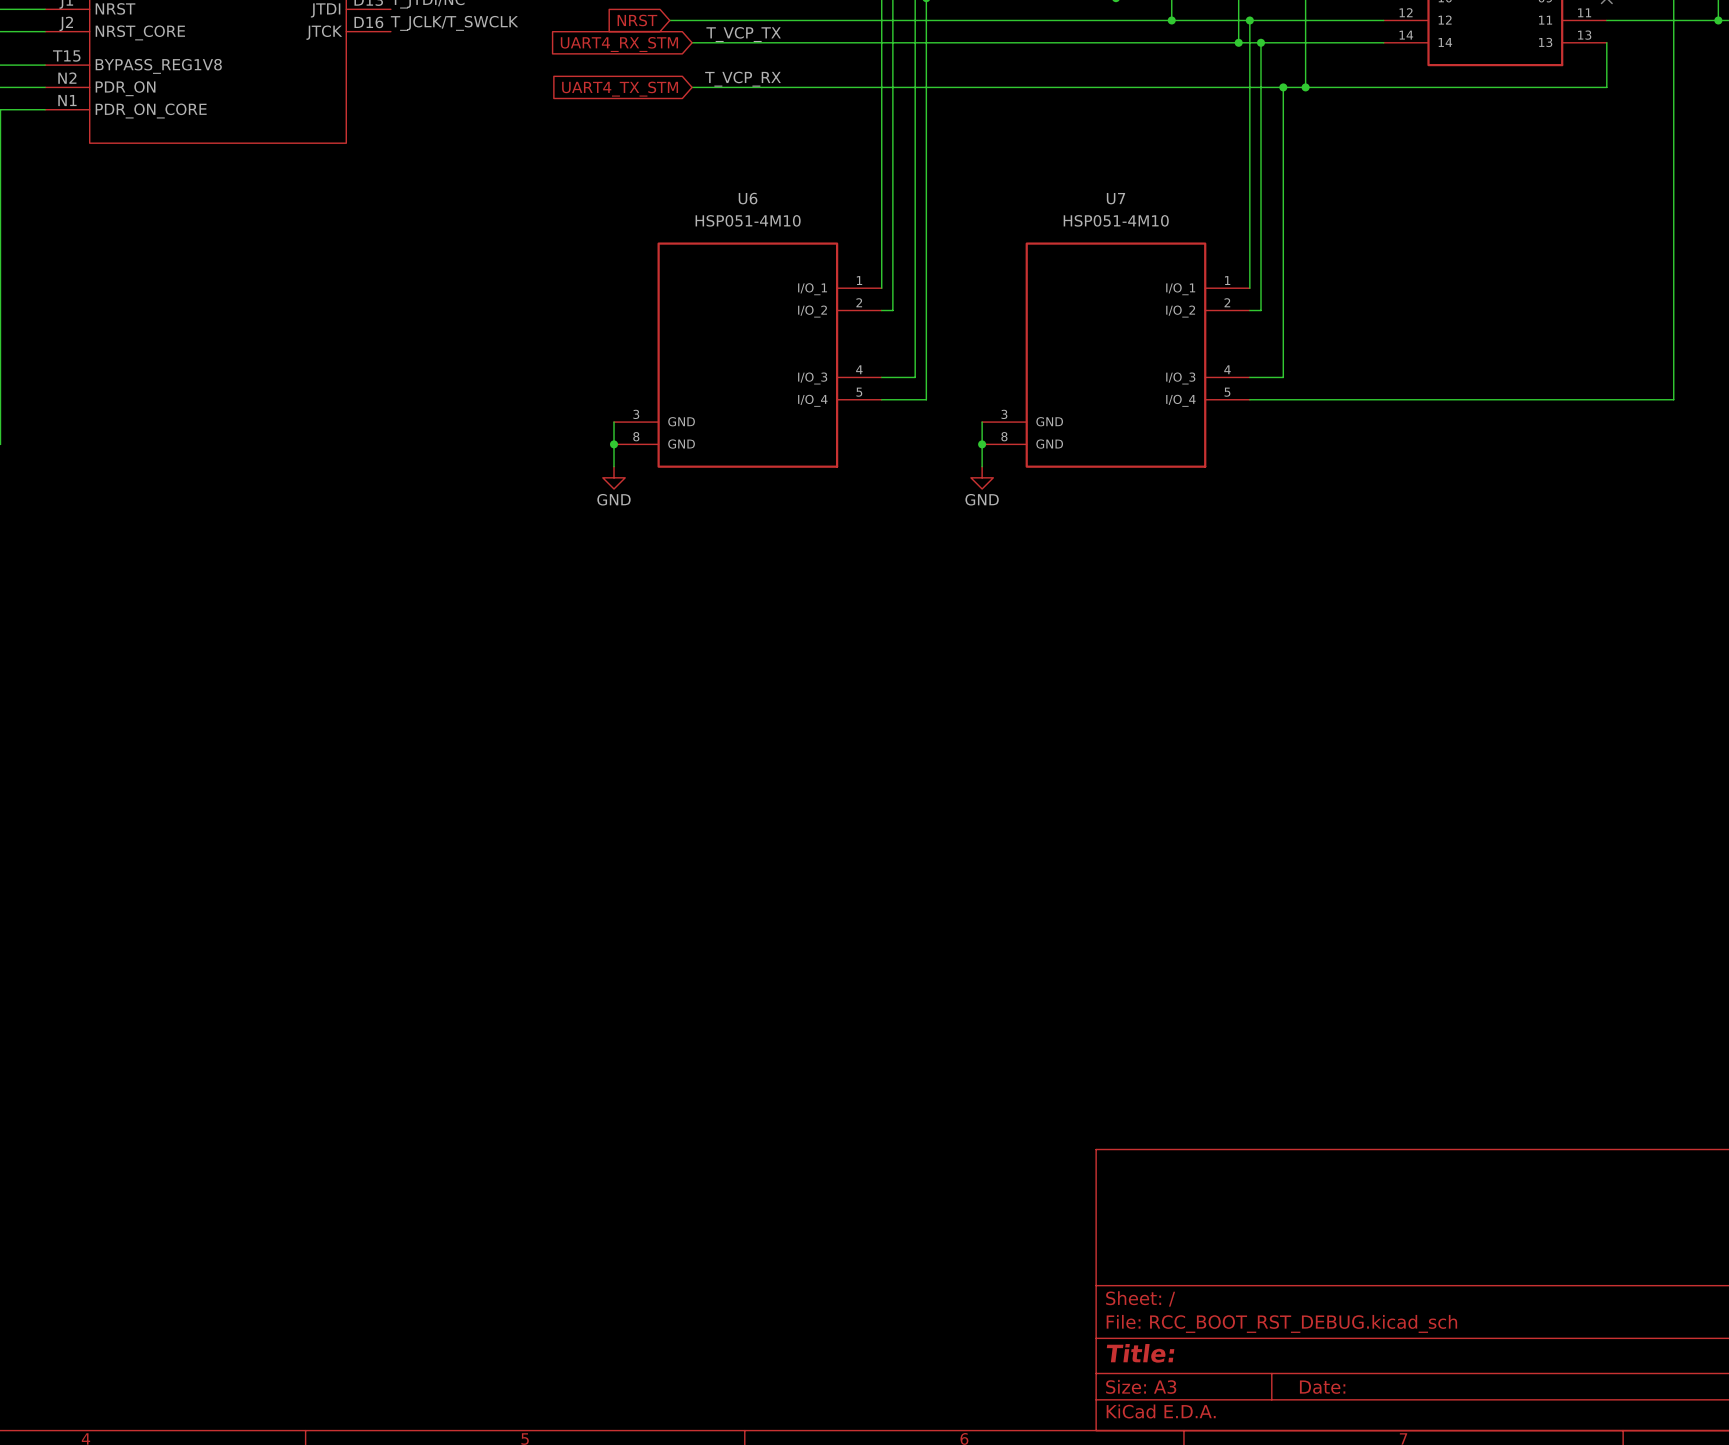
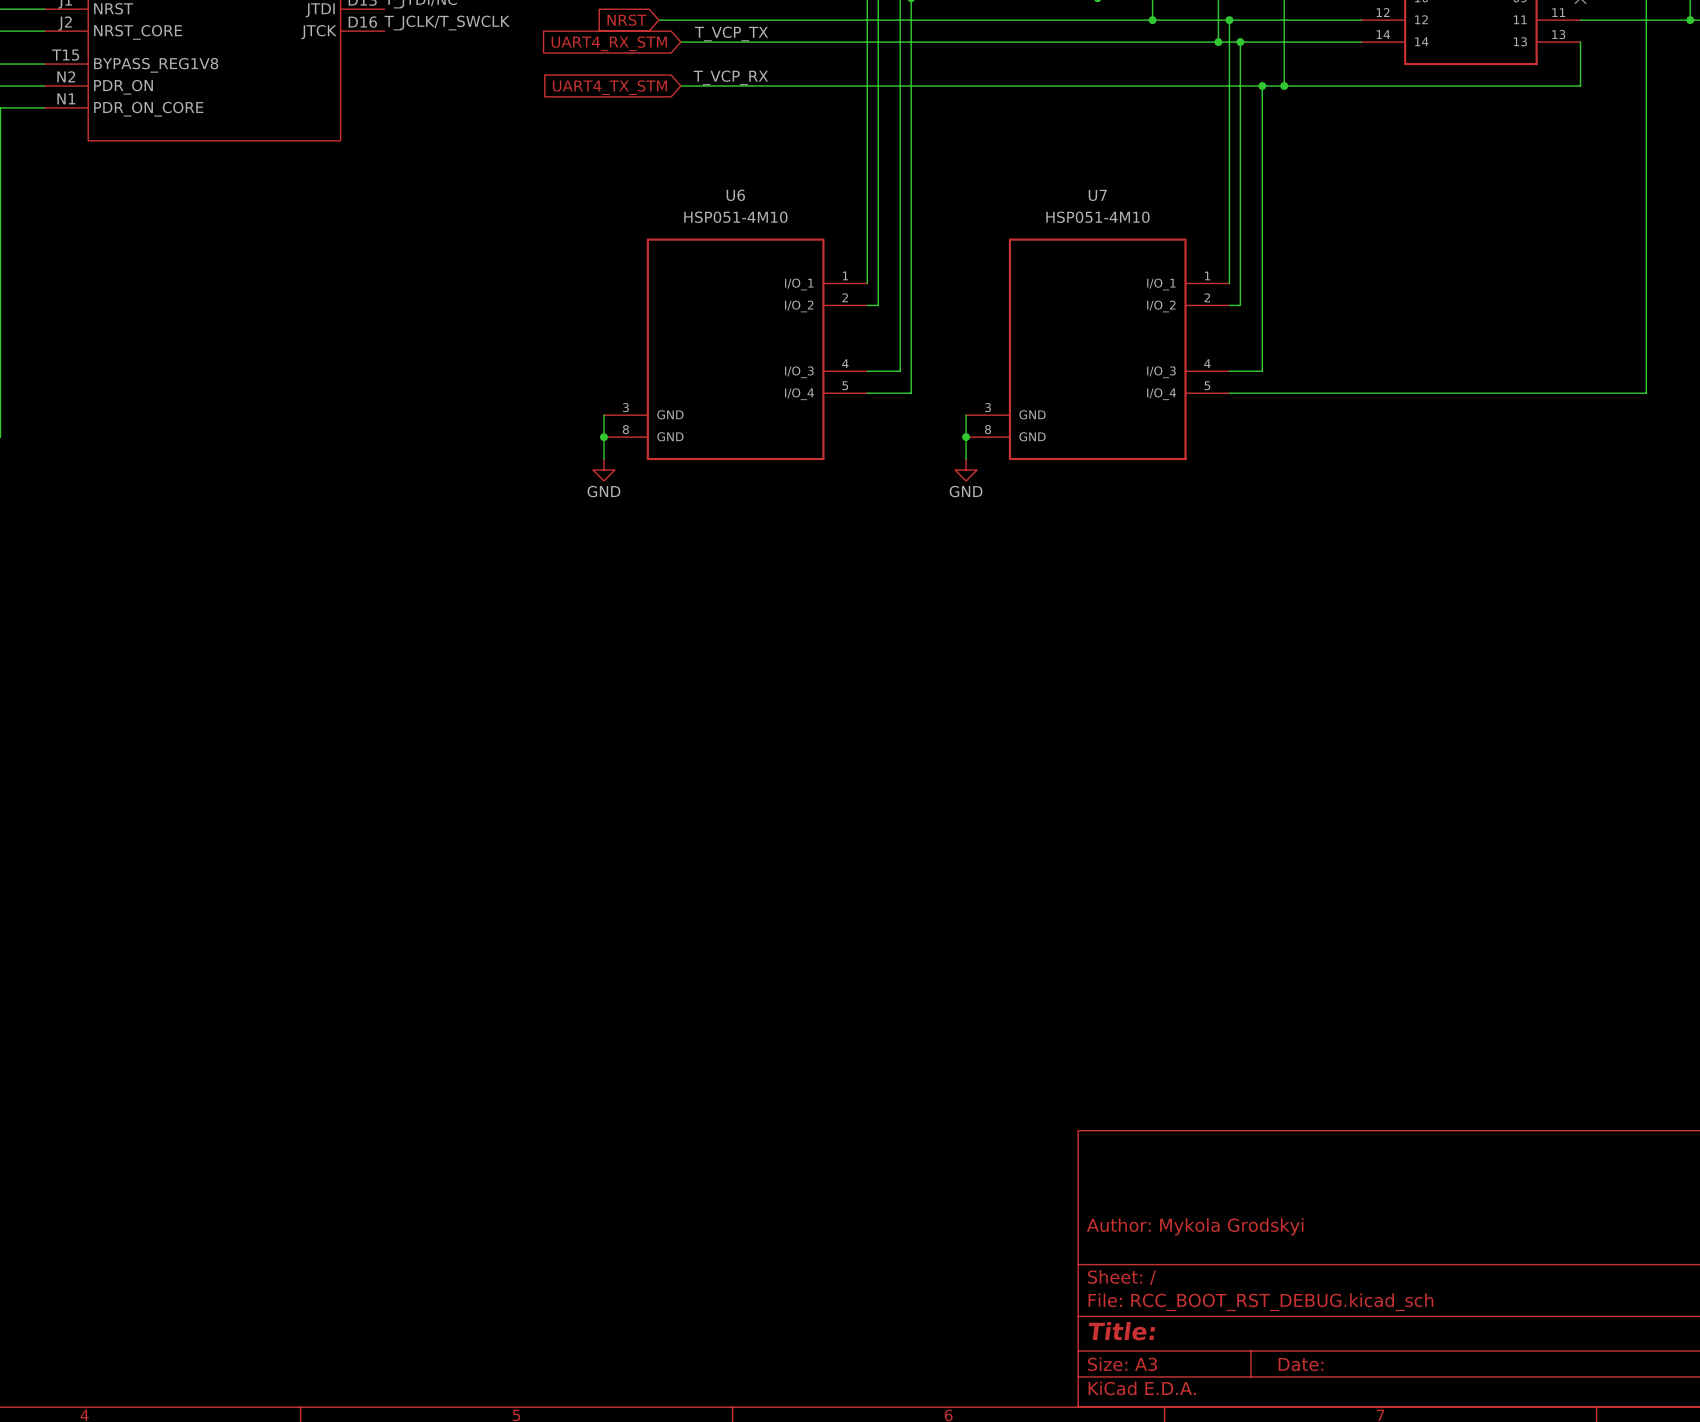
title block: none -> Author: Mykola Grodskyi (1195, 1226)

